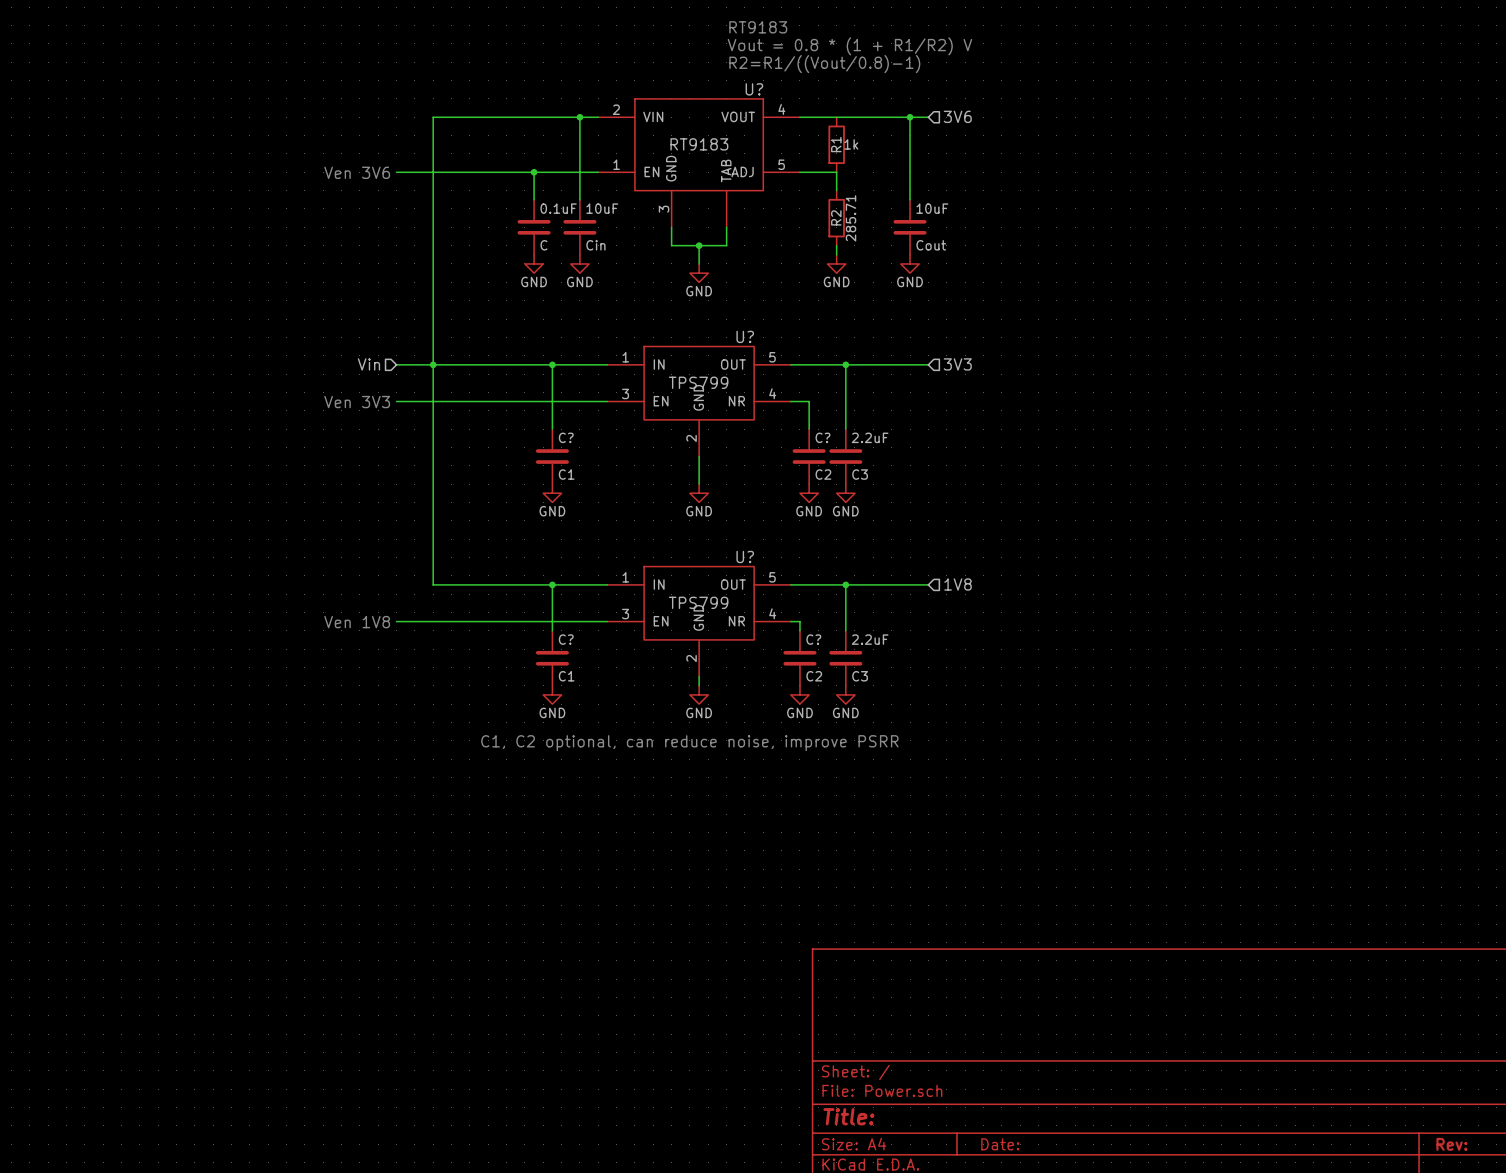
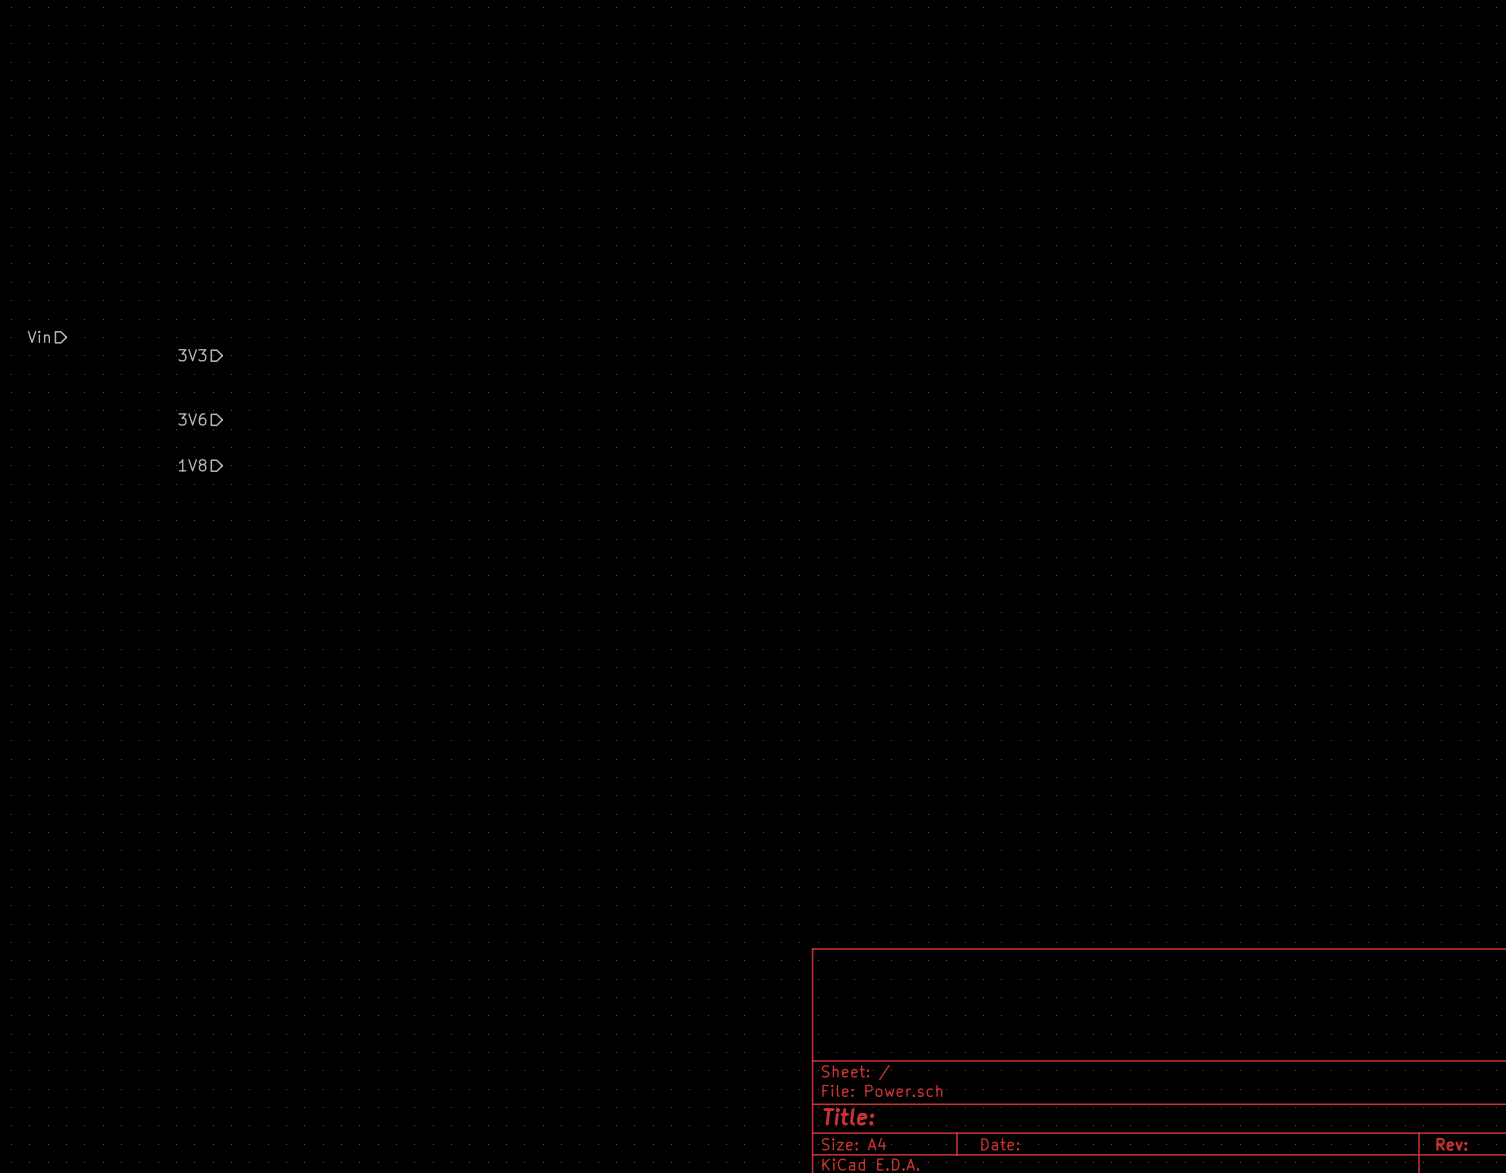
text: RT9183 (758, 27) -> none
text: Vout = 0.8 * (1 + R1/R2) V (849, 46) -> none
text: R2=R1/((Vout/0.8)-1) (824, 64) -> none
hierarchical label: 3V6 (957, 116) -> none
wire: (579, 117) (579, 199) -> none
junction: (579, 117) -> none
wire: (598, 117) (433, 117) (433, 584) (607, 584) -> none
wire: (799, 117) (928, 117) -> none
wire: (910, 117) (910, 199) -> none
junction: (910, 117) -> none
1k: R1 (836, 144) -> none
U?: RT9183 (699, 163) -> none
text: Ven 3V6 (357, 172) -> none
wire: (396, 172) (598, 172) -> none
wire: (534, 172) (534, 199) -> none
junction: (534, 172) -> none
wire: (799, 172) (836, 172) (836, 190) -> none
285.71: R2 (836, 218) -> none
0.1uF: C (534, 227) -> none
10uF: Cin (579, 227) -> none
wire: (671, 227) (671, 245) (726, 245) (726, 227) -> none
10uF: Cout (910, 227) -> none
wire: (699, 245) (699, 263) -> none
junction: (699, 245) -> none
wire: (836, 245) (836, 254) -> none
power symbol: GND (534, 263) -> none
power symbol: GND (579, 263) -> none
power symbol: GND (836, 263) -> none
power symbol: GND (910, 263) -> none
power symbol: GND (699, 273) -> none
hierarchical label: none -> Vin (38, 336)
hierarchical label: none -> 3V3 (192, 355)
hierarchical label: Vin (368, 364) -> none
wire: (396, 364) (607, 364) -> none
junction: (433, 364) -> none
wire: (552, 364) (552, 429) -> none
junction: (552, 364) -> none
wire: (790, 364) (928, 364) -> none
wire: (845, 364) (845, 429) -> none
junction: (845, 364) -> none
hierarchical label: 3V3 (957, 364) -> none
wire: (396, 401) (607, 401) -> none
U?: TPS799 (699, 401) -> none
wire: (790, 401) (809, 401) (809, 429) -> none
text: Ven 3V3 (357, 402) -> none
hierarchical label: none -> 3V6 (192, 419)
C?: C1 (552, 456) -> none
wire: (699, 456) (699, 484) -> none
C?: C2 (809, 456) -> none
2.2uF: C3 (845, 456) -> none
hierarchical label: none -> 1V8 (192, 465)
power symbol: GND (552, 493) -> none
power symbol: GND (699, 493) -> none
power symbol: GND (809, 493) -> none
power symbol: GND (845, 493) -> none
wire: (552, 584) (552, 630) -> none
junction: (552, 584) -> none
wire: (790, 584) (928, 584) -> none
wire: (845, 584) (845, 630) -> none
junction: (845, 584) -> none
hierarchical label: 1V8 (958, 584) -> none
wire: (396, 621) (607, 621) -> none
U?: TPS799 (699, 621) -> none
wire: (790, 621) (799, 621) (799, 630) -> none
text: Ven 1V8 (357, 622) -> none
C?: C1 (552, 658) -> none
C?: C2 (799, 658) -> none
2.2uF: C3 (845, 658) -> none
wire: (699, 676) (699, 685) -> none
power symbol: GND (552, 694) -> none
power symbol: GND (699, 694) -> none
power symbol: GND (799, 694) -> none
power symbol: GND (845, 694) -> none
text: C1, C2 optional, can reduce noise, improve PSRR (689, 743) -> none

